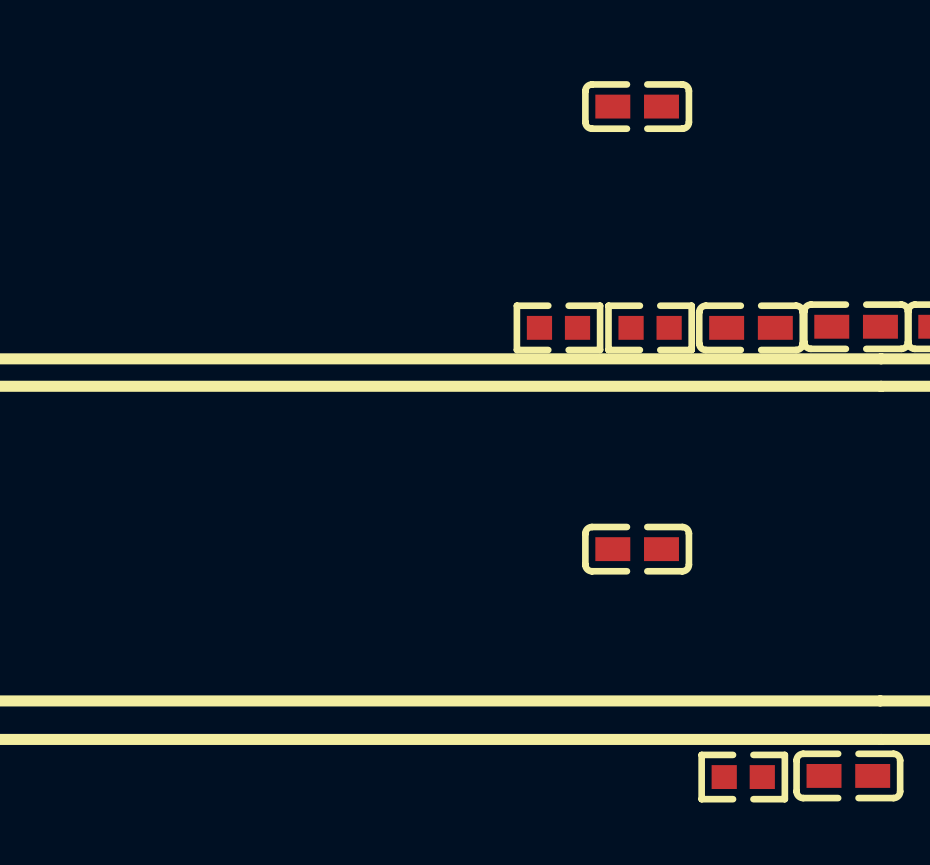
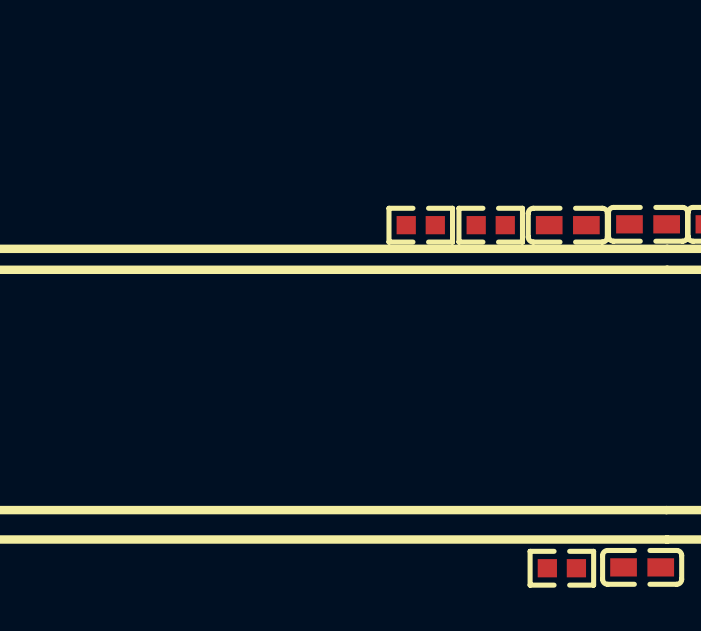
part: (637, 106) -> none
part: (637, 549) -> none

